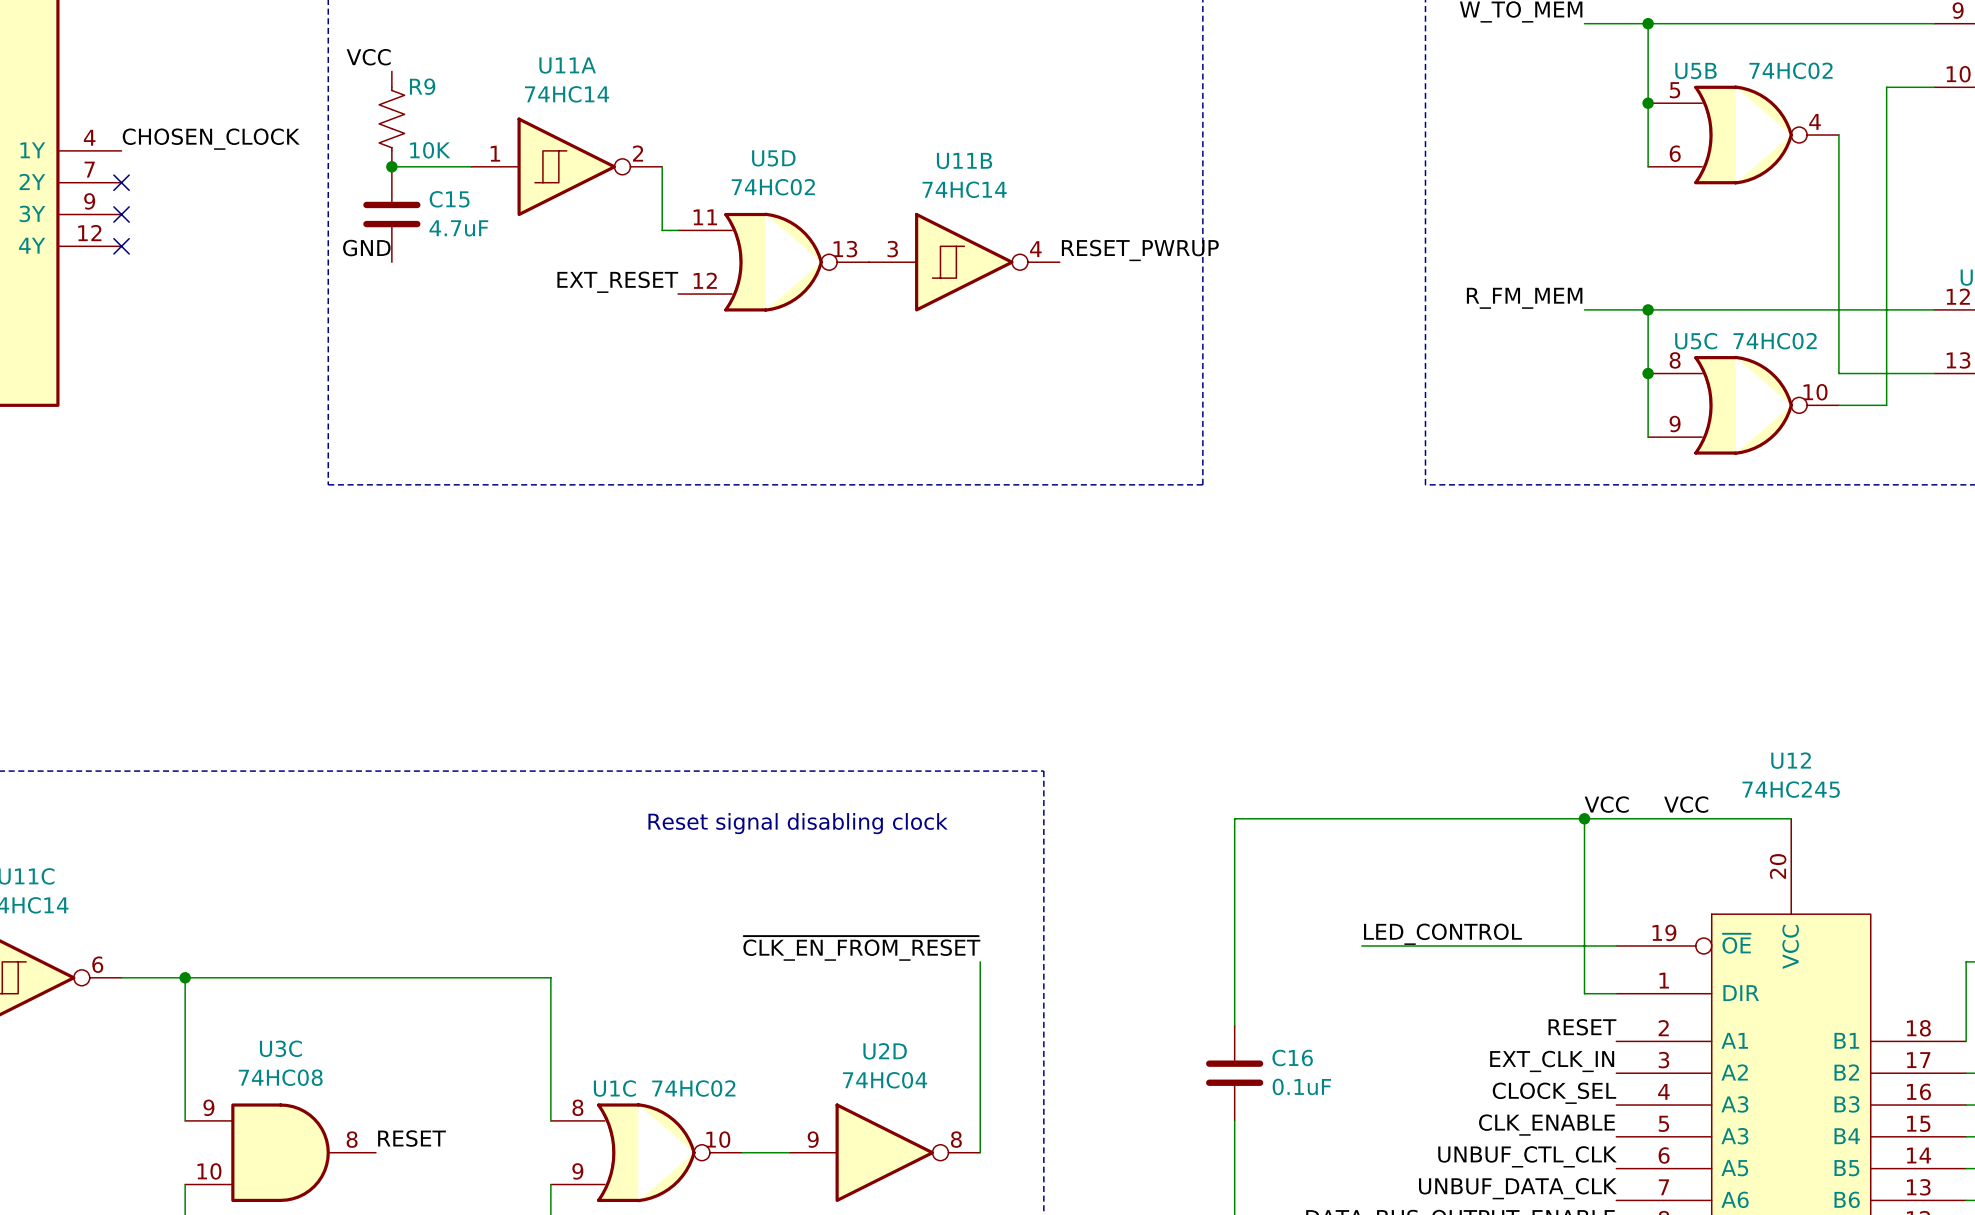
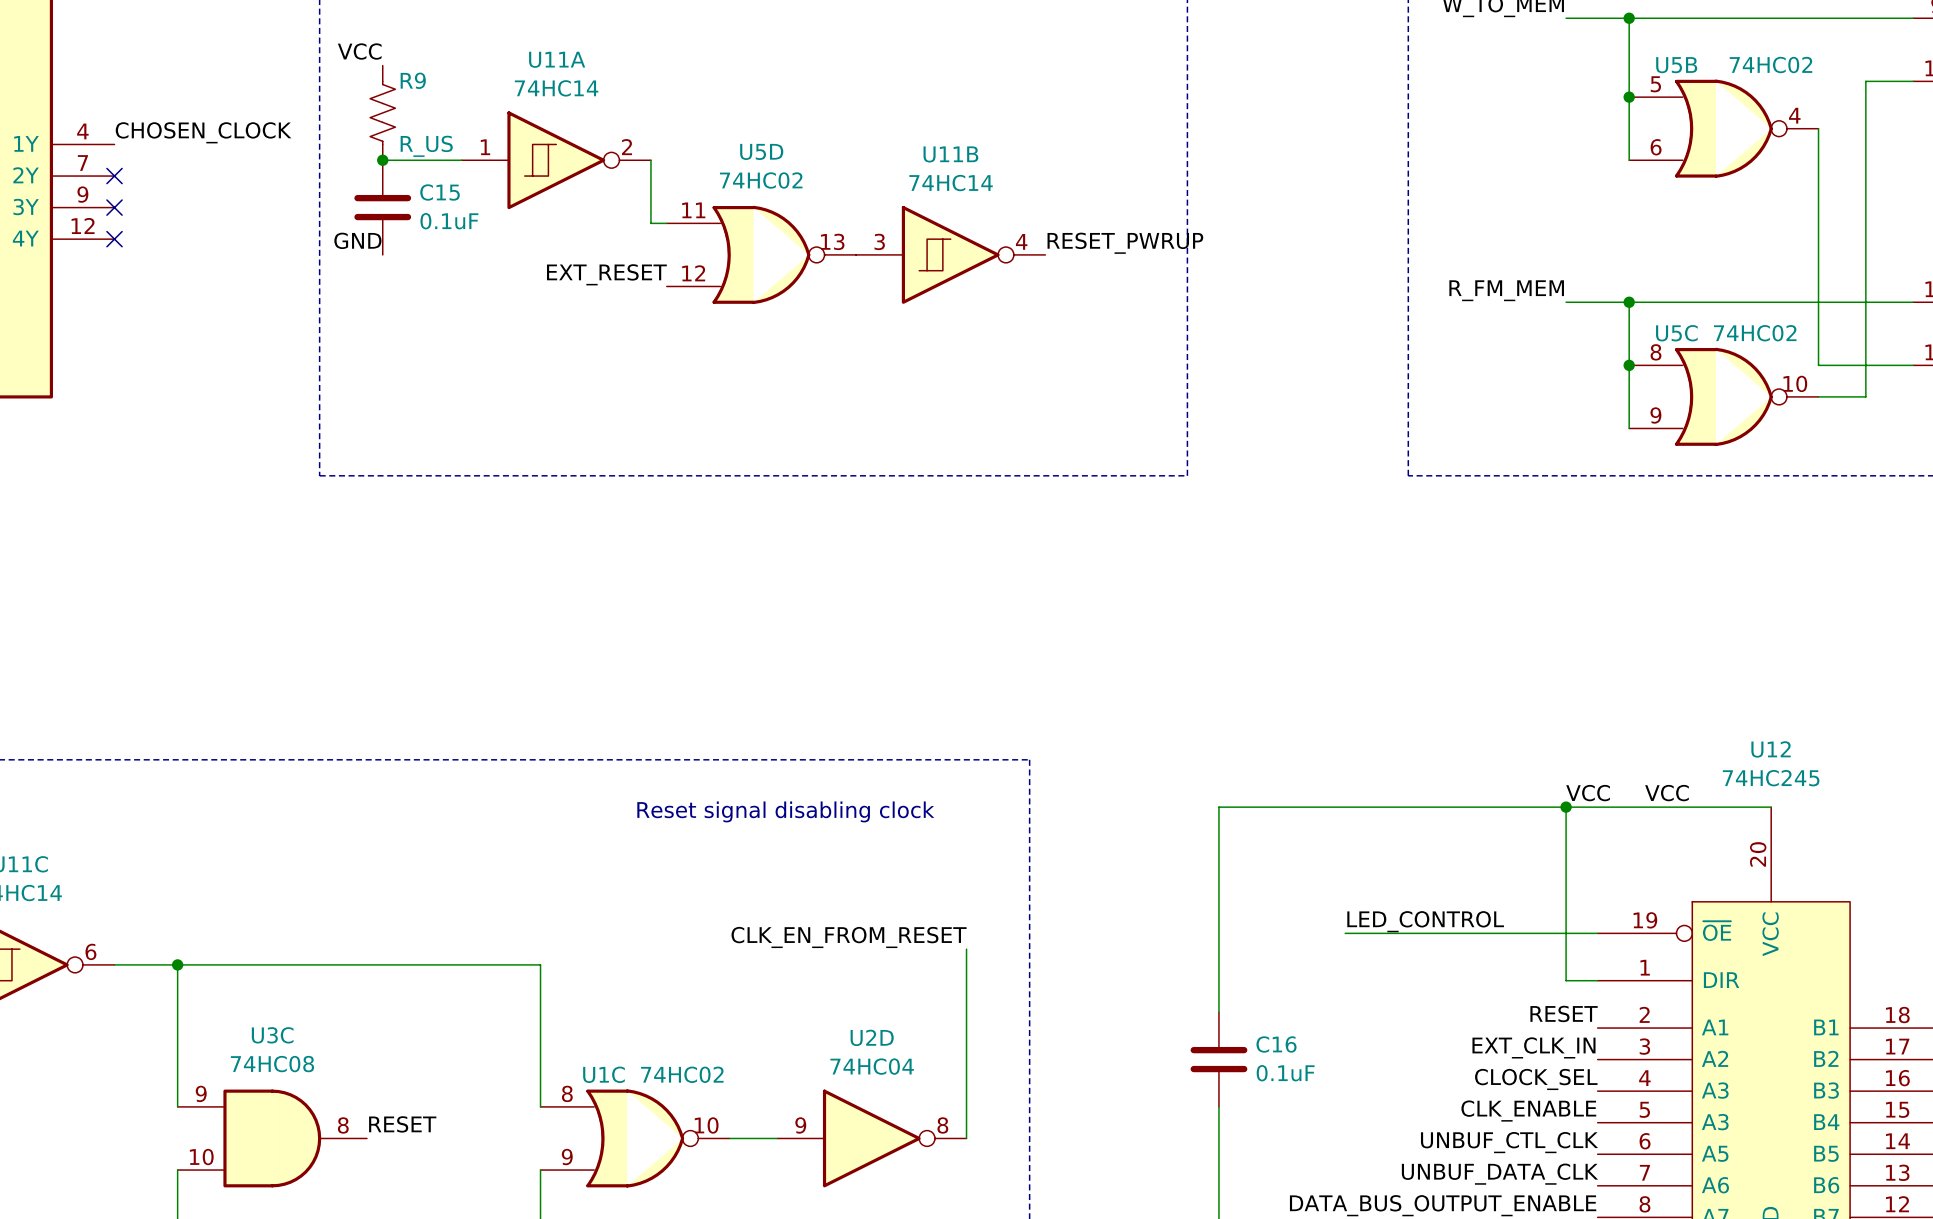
R9 value: 10K (430, 150) -> R_US (426, 146)
C15 value: 4.7uF (458, 228) -> 0.1uF (449, 221)
label: ~{CLK_EN_FROM_RESET} (861, 948) -> CLK_EN_FROM_RESET (849, 937)

